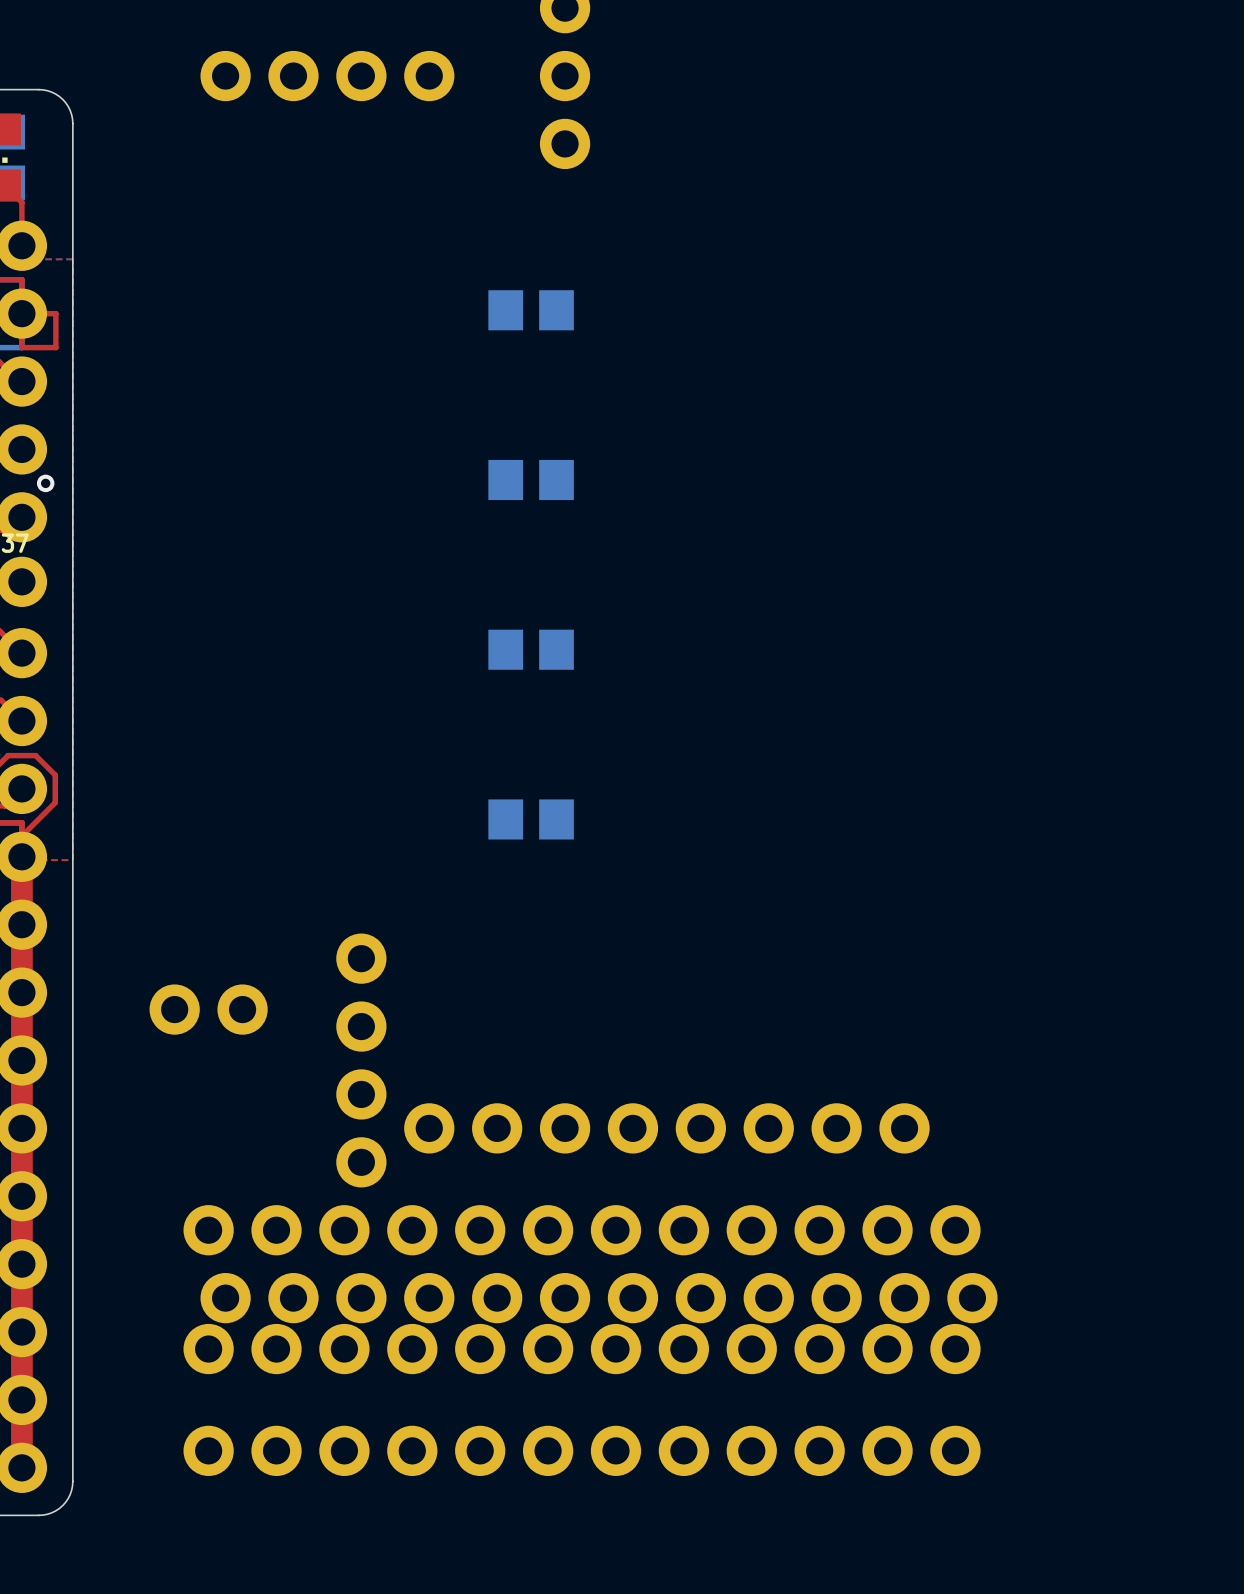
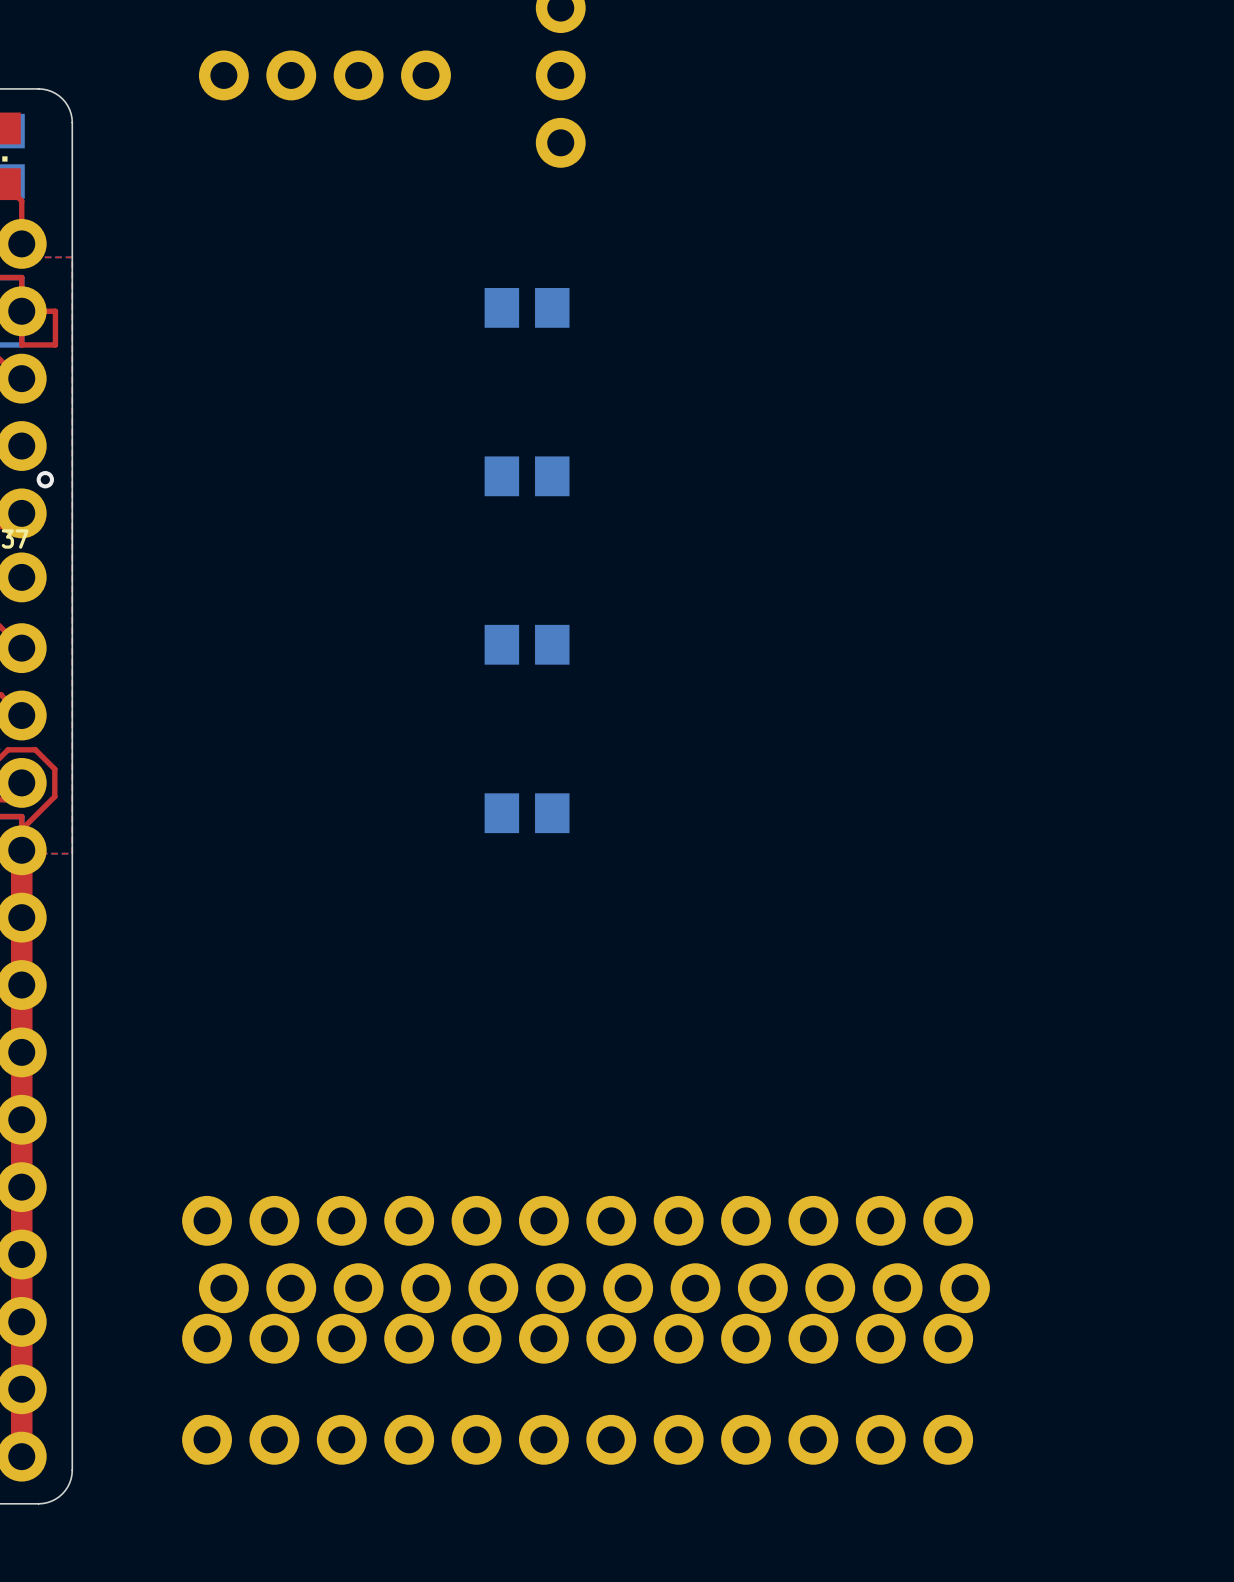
part: (208, 1009) -> none
part: (361, 1060) -> none
part: (666, 1128) -> none

